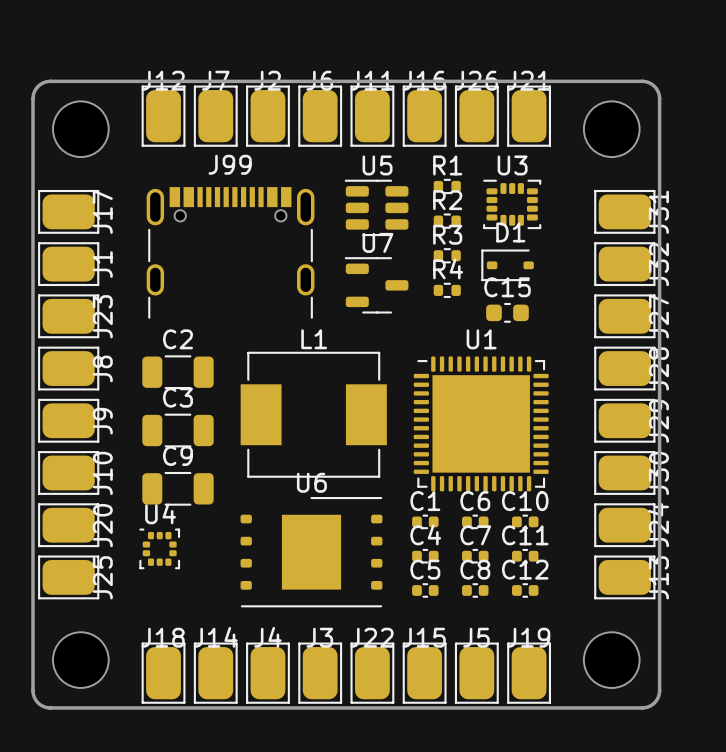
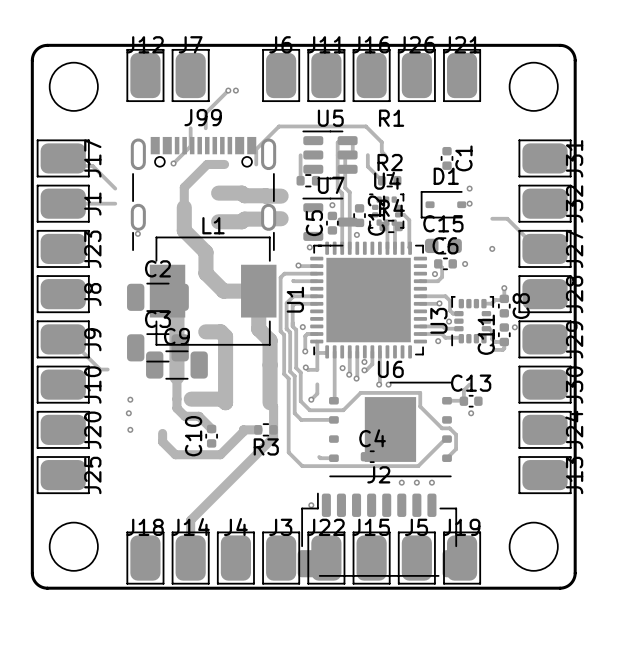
J2 footprint: [246, 85, 290, 147] -> [297, 492, 461, 578]
track: none -> (228, 90) (205, 113) (205, 128)
via: none -> (228, 90)
via: none -> (235, 90)
track: none -> (190, 128) (190, 146) (173, 163)
R1 position: (447, 186) -> (308, 180)
U3 rotation: 0° (512, 204) -> 90° counterclockwise (472, 321)
U3 position: (512, 204) -> (472, 321)
track: none -> (300, 155) (300, 180)
track: none -> (345, 155) (345, 187) (349, 192) (349, 248)
track: none -> (352, 155) (352, 142) (337, 142) (337, 188) (342, 193) (342, 248)
track: none -> (367, 155) (367, 166) (382, 180)
track: none -> (385, 155) (381, 151) (381, 142) (365, 126) (279, 126) (256, 149) (256, 164)
via: none -> (173, 163)
track: none -> (224, 164) (207, 164) (184, 187) (184, 230) (205, 252) (205, 273) (223, 291) (258, 291) (258, 329) (270, 340) (270, 402) (273, 406) (273, 437) (190, 520) (190, 558)
track: none -> (77, 165) (92, 165) (115, 188)
R2 position: (447, 221) -> (389, 180)
R3 name position: R3 (447, 234) -> R3 (266, 446)
via: none -> (469, 188)
track: none -> (218, 193) (281, 196)
R3 position: (447, 255) -> (265, 429)
track: none -> (62, 203) (115, 203)
via: none -> (469, 203)
via: none -> (332, 205)
track: none -> (398, 214) (403, 214) (409, 220) (410, 248)
track: none -> (281, 218) (218, 221)
track: none -> (492, 218) (507, 218) (529, 241)
track: none -> (386, 222) (387, 248)
track: none -> (394, 222) (394, 248)
via: none -> (137, 233)
via: none -> (356, 234)
via: none -> (309, 247)
via: none -> (492, 248)
track: none -> (438, 263) (442, 267) (442, 277) (437, 281) (420, 281)
via: none -> (465, 263)
track: none -> (298, 265) (316, 266)
via: none -> (298, 265)
track: none -> (316, 273) (284, 273) (280, 277) (280, 331) (284, 334) (284, 374) (288, 378) (288, 452) (302, 466) (418, 466) (447, 439)
via: none -> (434, 274)
track: none -> (293, 280) (316, 281)
track: none -> (504, 288) (503, 300) (483, 303)
via: none -> (504, 288)
track: none -> (167, 291) (176, 300) (176, 408) (184, 416) (198, 416) (211, 428)
track: none -> (316, 296) (293, 296) (286, 303) (286, 328) (290, 332) (290, 371) (294, 376) (294, 413) (301, 419) (333, 419)
track: none -> (420, 296) (445, 296) (450, 300) (450, 310) (453, 313) (458, 313)
track: none -> (316, 303) (294, 303) (292, 305) (292, 326) (296, 329) (296, 368) (300, 372) (300, 401) (309, 410) (343, 410) (360, 392) (420, 392) (420, 406) (442, 428) (449, 428) (456, 434) (456, 449) (447, 458)
track: none -> (439, 303) (420, 303)
via: none -> (439, 303)
via: none -> (449, 321)
track: none -> (420, 326) (458, 328)
via: none -> (302, 327)
via: none -> (514, 327)
track: none -> (486, 328) (492, 331) (492, 339) (494, 341) (504, 341) (502, 349) (493, 349)
track: none -> (205, 331) (220, 331) (225, 336) (225, 402) (221, 399) (191, 399)
L1 position: (313, 414) -> (213, 291)
track: none -> (316, 333) (307, 333) (305, 336) (305, 351)
track: none -> (420, 333) (441, 333) (445, 337) (461, 338)
via: none -> (438, 341)
track: none -> (316, 341) (317, 369) (308, 369) (305, 367)
U1 rotation: 0° (481, 423) -> 90° counterclockwise (368, 300)
track: none -> (77, 346) (100, 369) (107, 369)
via: none -> (305, 351)
track: none -> (327, 351) (317, 352)
track: none -> (334, 351) (333, 400)
track: none -> (349, 351) (349, 374)
track: none -> (357, 351) (356, 378)
track: none -> (372, 351) (372, 364) (364, 370)
track: none -> (379, 351) (379, 384)
via: none -> (364, 362)
via: none -> (305, 367)
via: none -> (342, 368)
via: none -> (364, 370)
via: none -> (349, 374)
via: none -> (356, 378)
track: none -> (317, 384) (317, 393) (311, 399)
via: none -> (379, 384)
via: none -> (388, 384)
track: none -> (469, 384) (463, 390) (463, 401) (447, 400)
C9 position: (177, 488) -> (176, 365)
via: none -> (130, 399)
via: none -> (311, 399)
C13: none -> (471, 401)
via: none -> (128, 413)
via: none -> (471, 413)
C1 rotation: 0° (425, 521) -> 90° clockwise (447, 158)
C1 position: (425, 521) -> (447, 158)
C6 position: (475, 521) -> (445, 263)
C10 rotation: 0° (525, 521) -> 90° clockwise (211, 436)
C10 position: (525, 521) -> (211, 436)
via: none -> (130, 429)
track: none -> (258, 429) (243, 429) (220, 454) (175, 454) (162, 441) (162, 433)
U4 position: (159, 548) -> (386, 211)
U6 position: (311, 552) -> (390, 429)
track: none -> (319, 457) (333, 458)
C7: (475, 556) -> none
C11 rotation: 0° (525, 556) -> 90° clockwise (504, 334)
C11 position: (525, 556) -> (504, 334)
via: none -> (401, 482)
via: none -> (416, 482)
via: none -> (431, 482)
C5 rotation: 0° (425, 590) -> 90° clockwise (332, 223)
C5 position: (425, 590) -> (332, 223)
C8 rotation: 0° (475, 590) -> 90° clockwise (504, 306)
C8 position: (475, 590) -> (504, 306)
C12 rotation: 0° (525, 590) -> 90° clockwise (359, 215)
C12 position: (525, 590) -> (359, 215)
via: none -> (311, 505)

